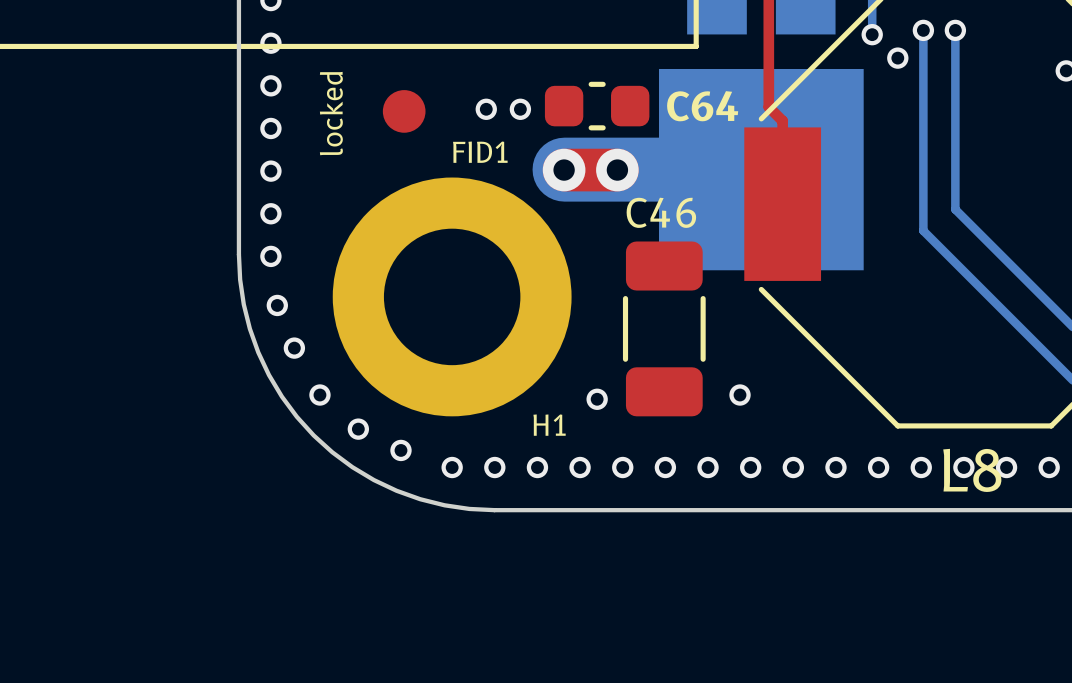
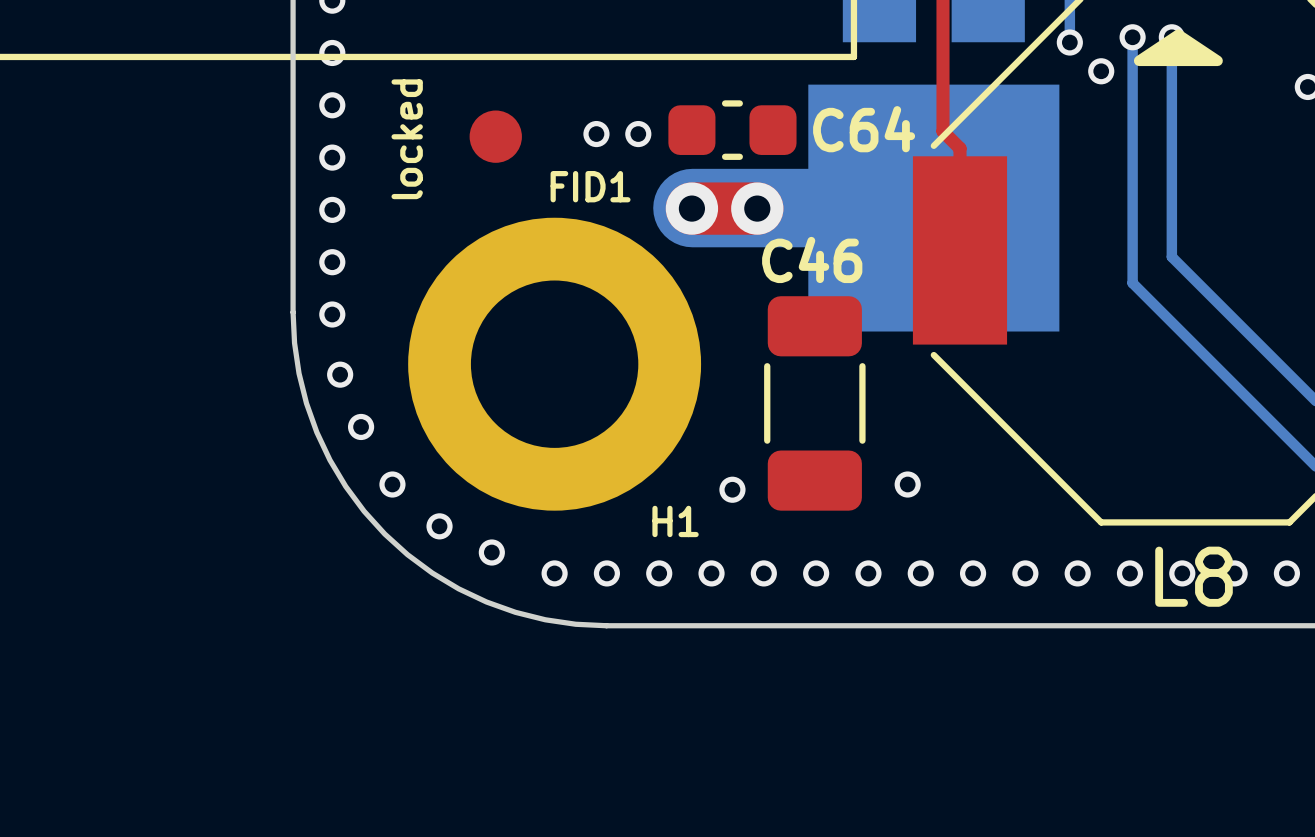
drawing: none -> [1133, 29, 1223, 67]

